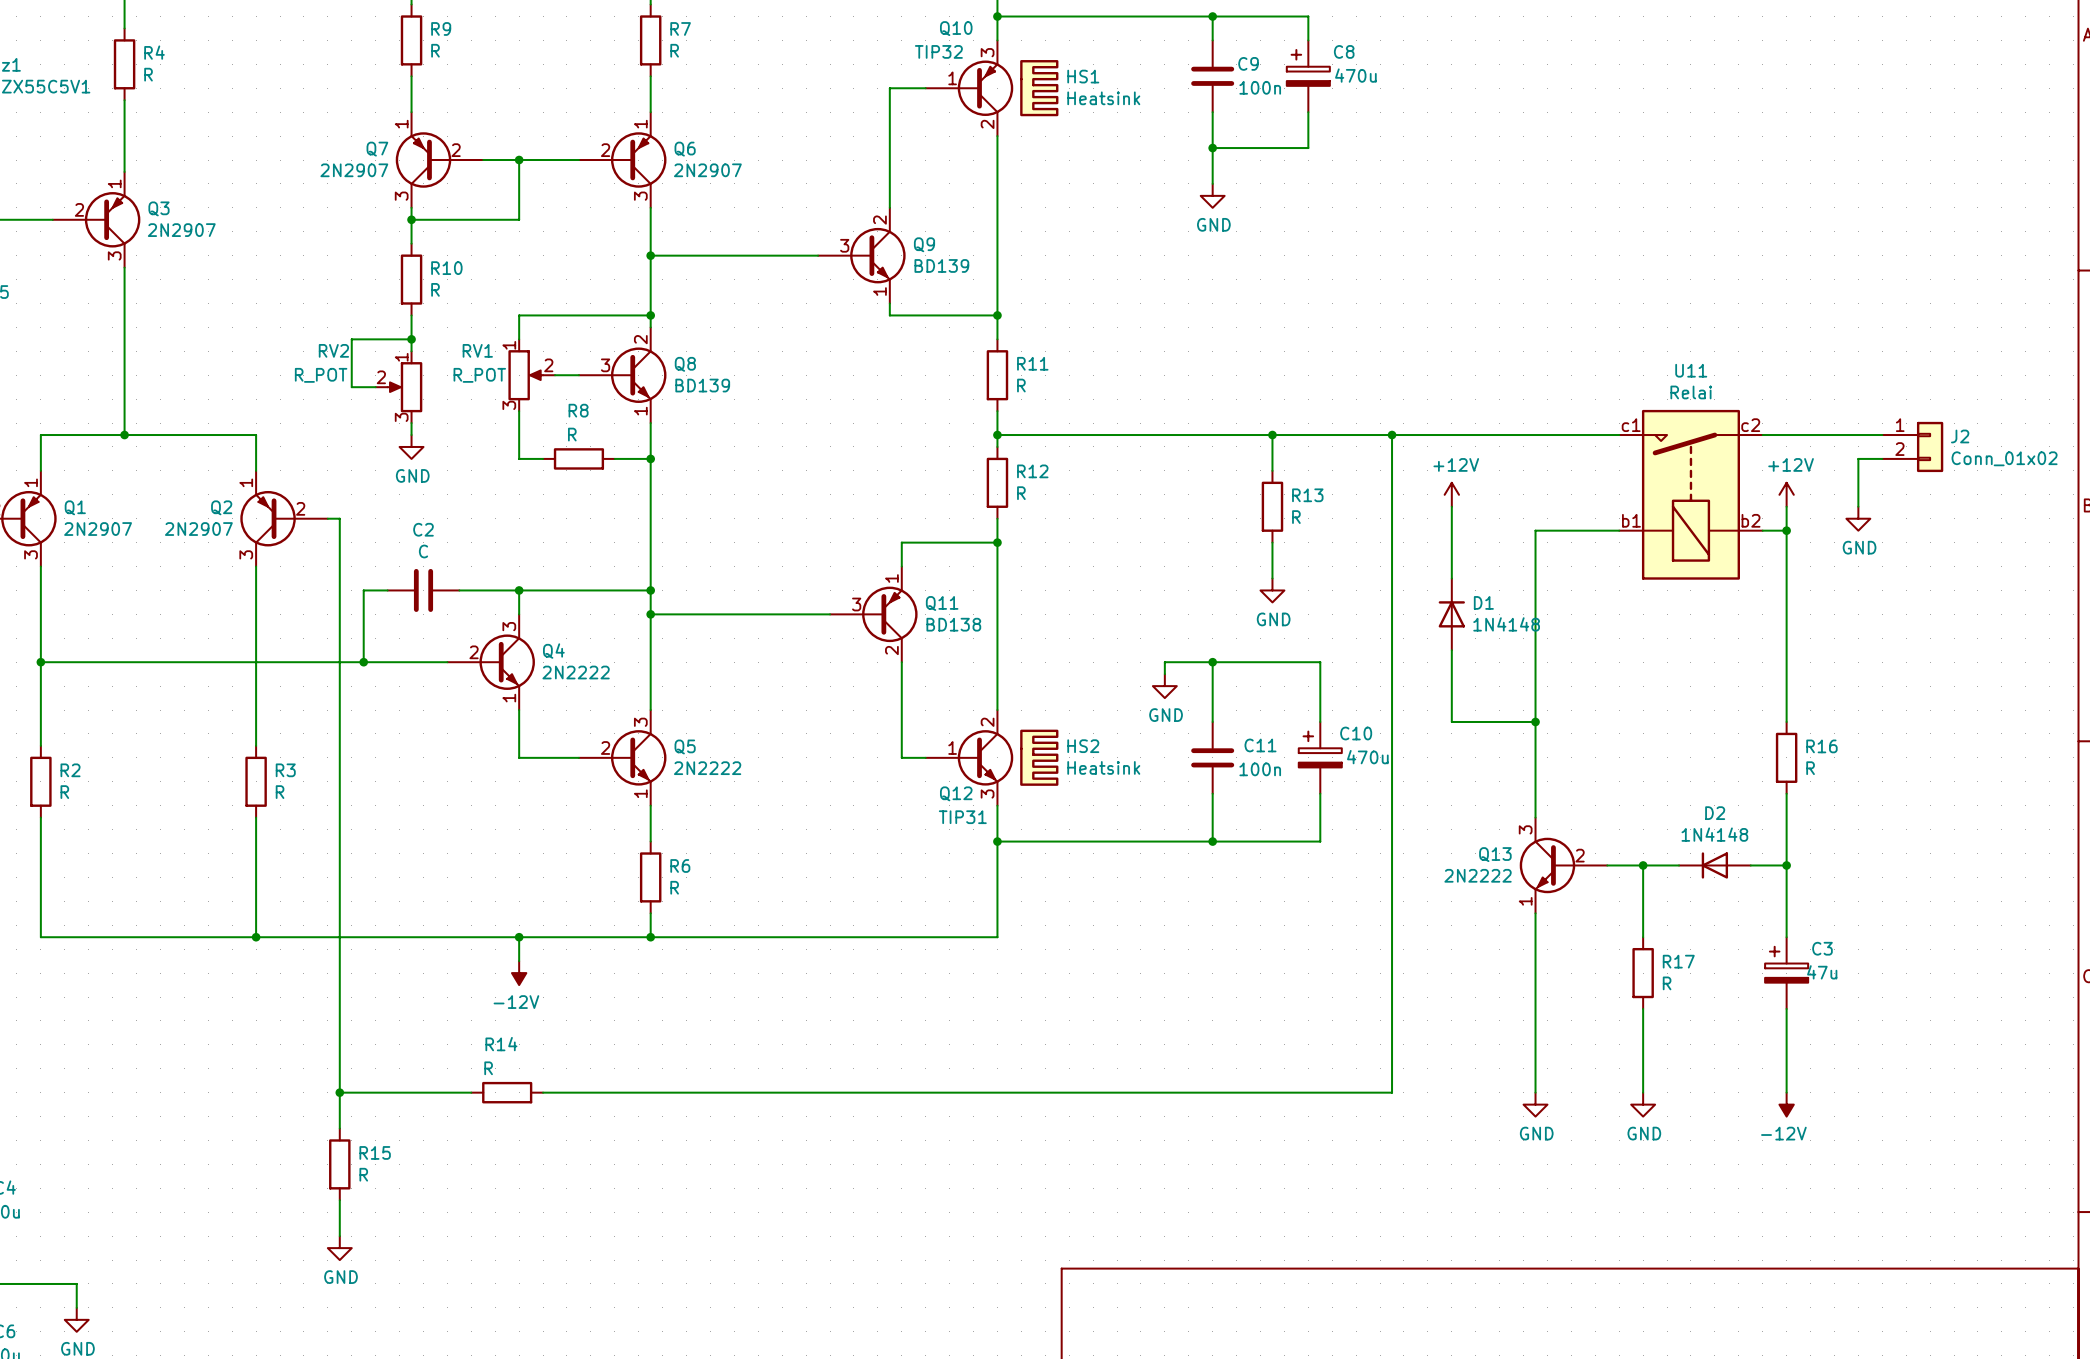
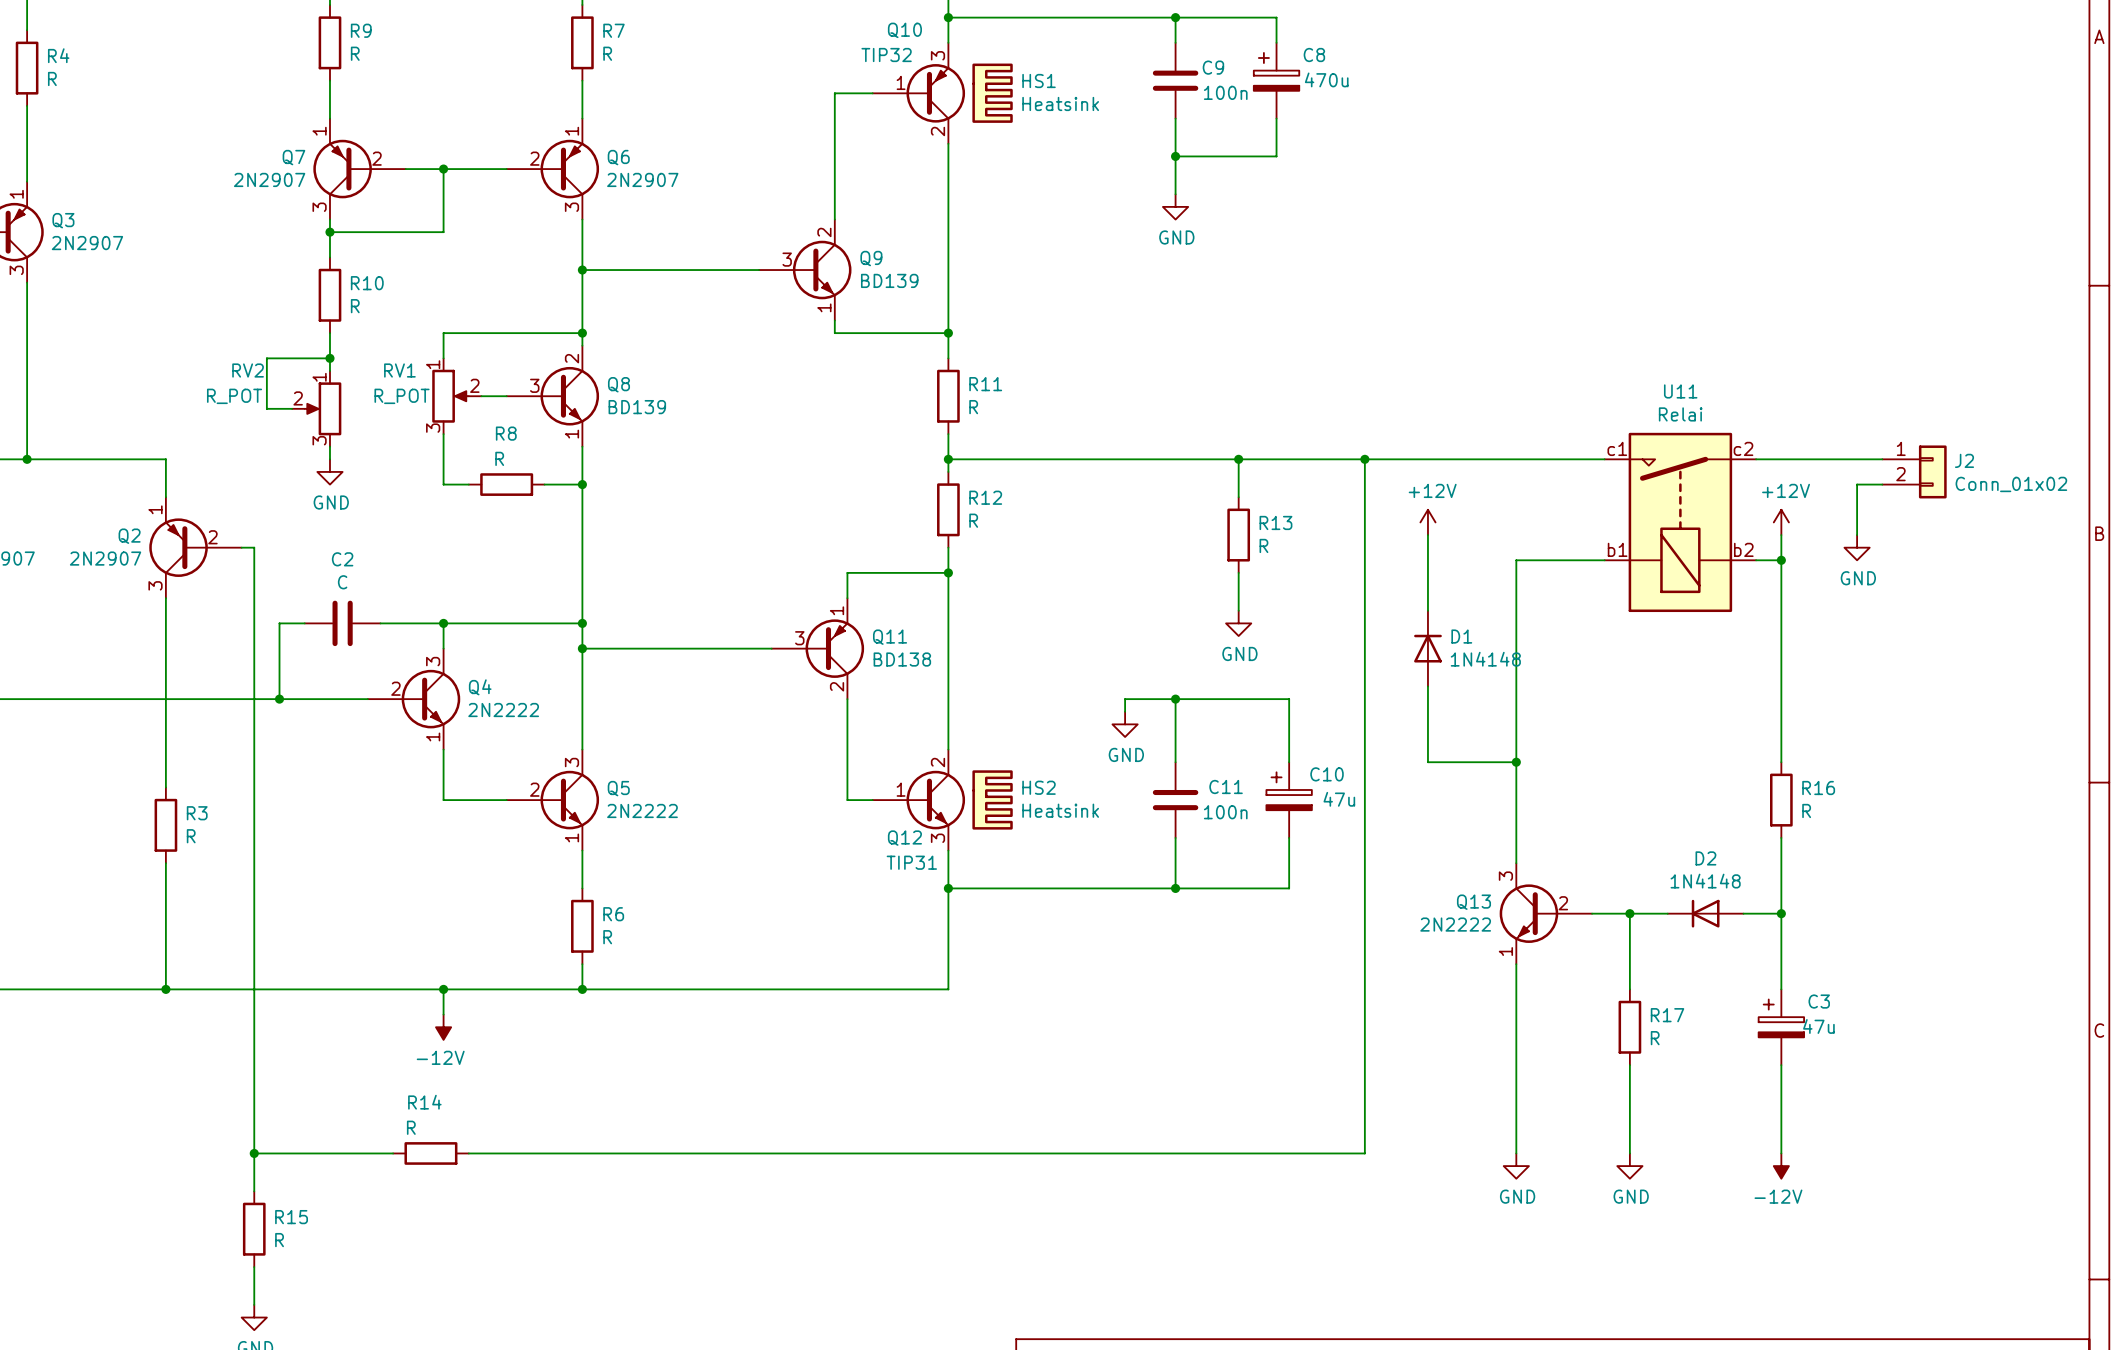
C10 value: 470u (1367, 757) -> 47u (1339, 799)

